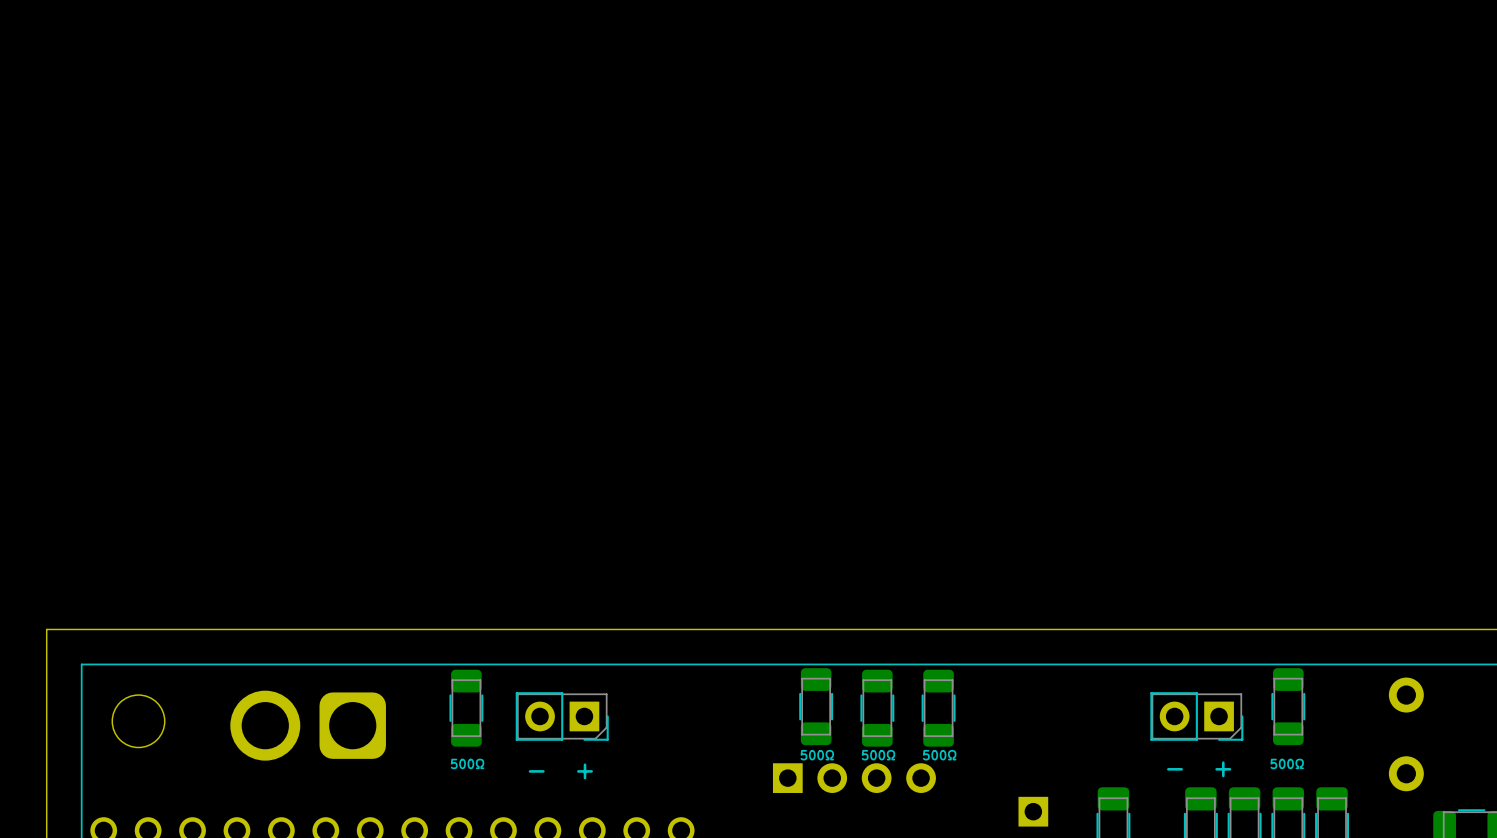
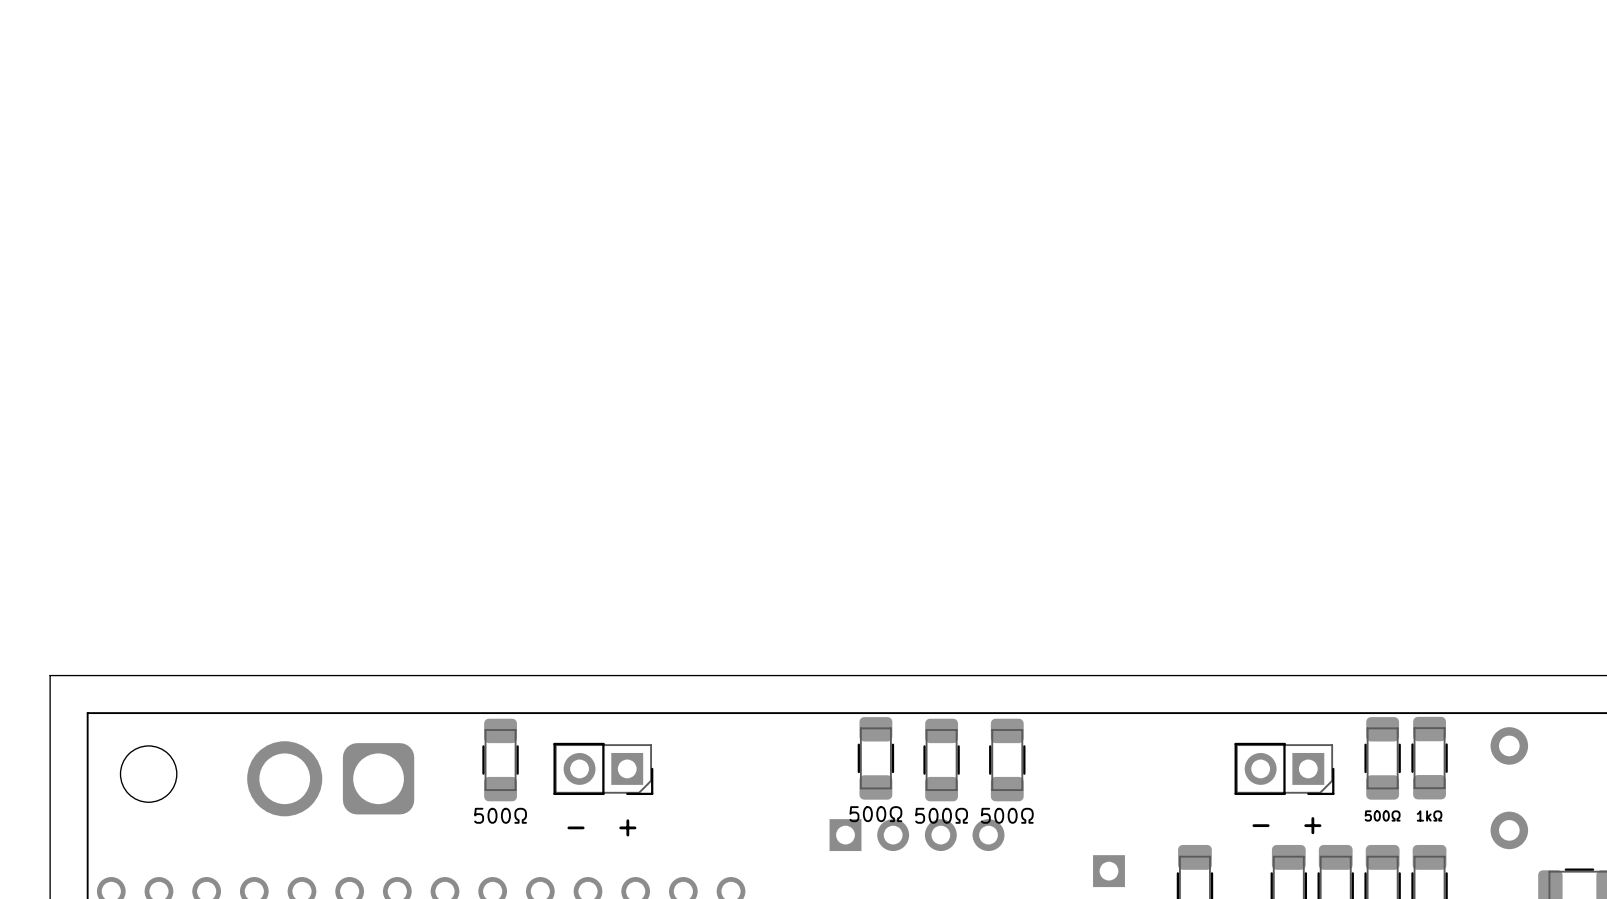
1kΩ: none -> (1429, 758)
text: 500Ω (817, 755) -> none
text: 500Ω (878, 755) -> none
text: 500Ω (939, 755) -> none
500Ω name: none -> 500Ω (875, 814)
500Ω name: none -> 500Ω (500, 815)
500Ω name: none -> 500Ω (941, 815)
500Ω name: none -> 500Ω (1007, 815)
500Ω name: none -> 500Ω (1382, 815)
text: 500Ω (467, 763) -> none
text: 500Ω (1287, 763) -> none

